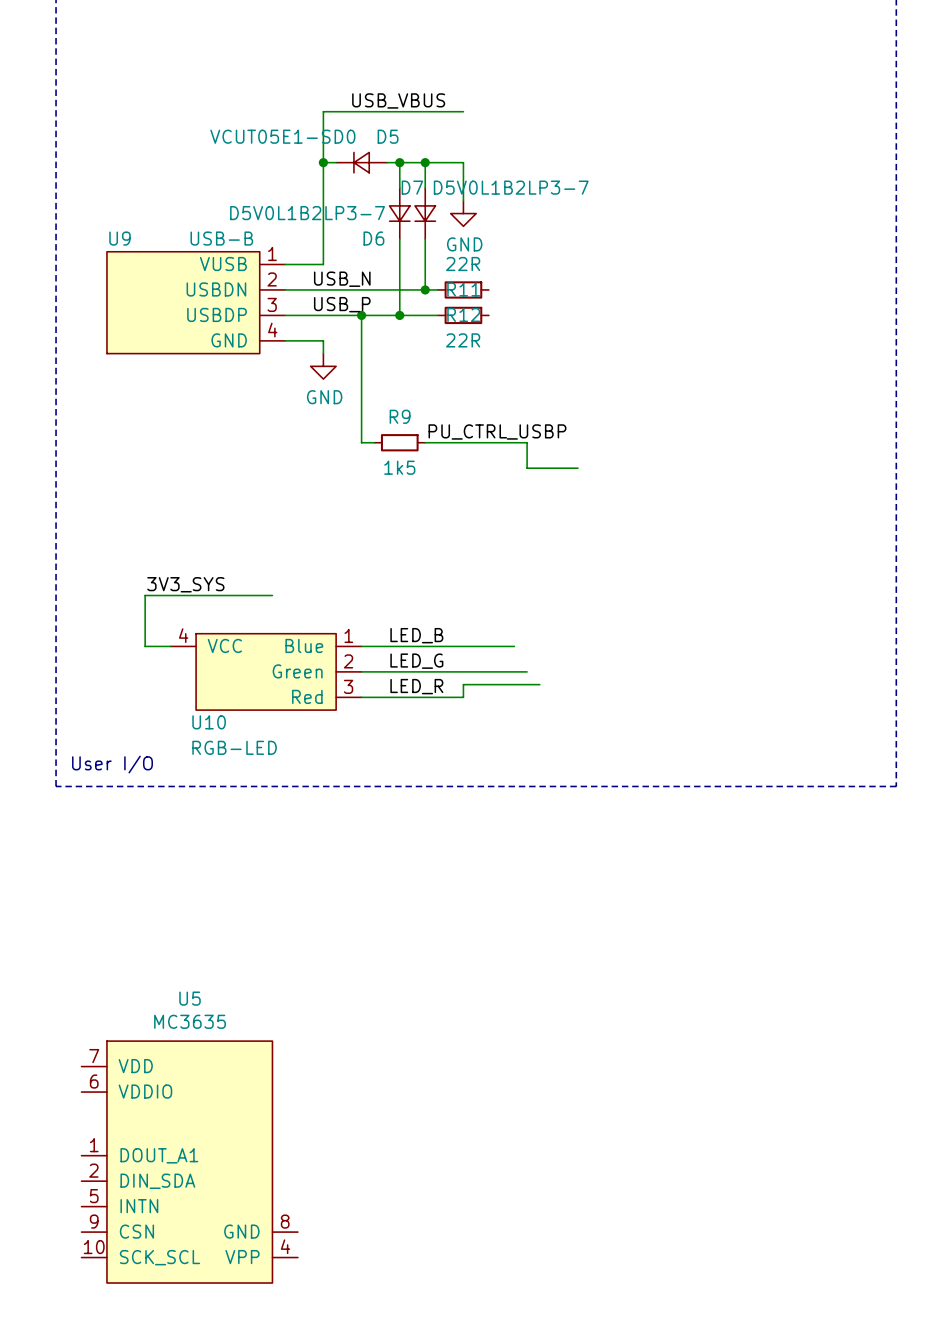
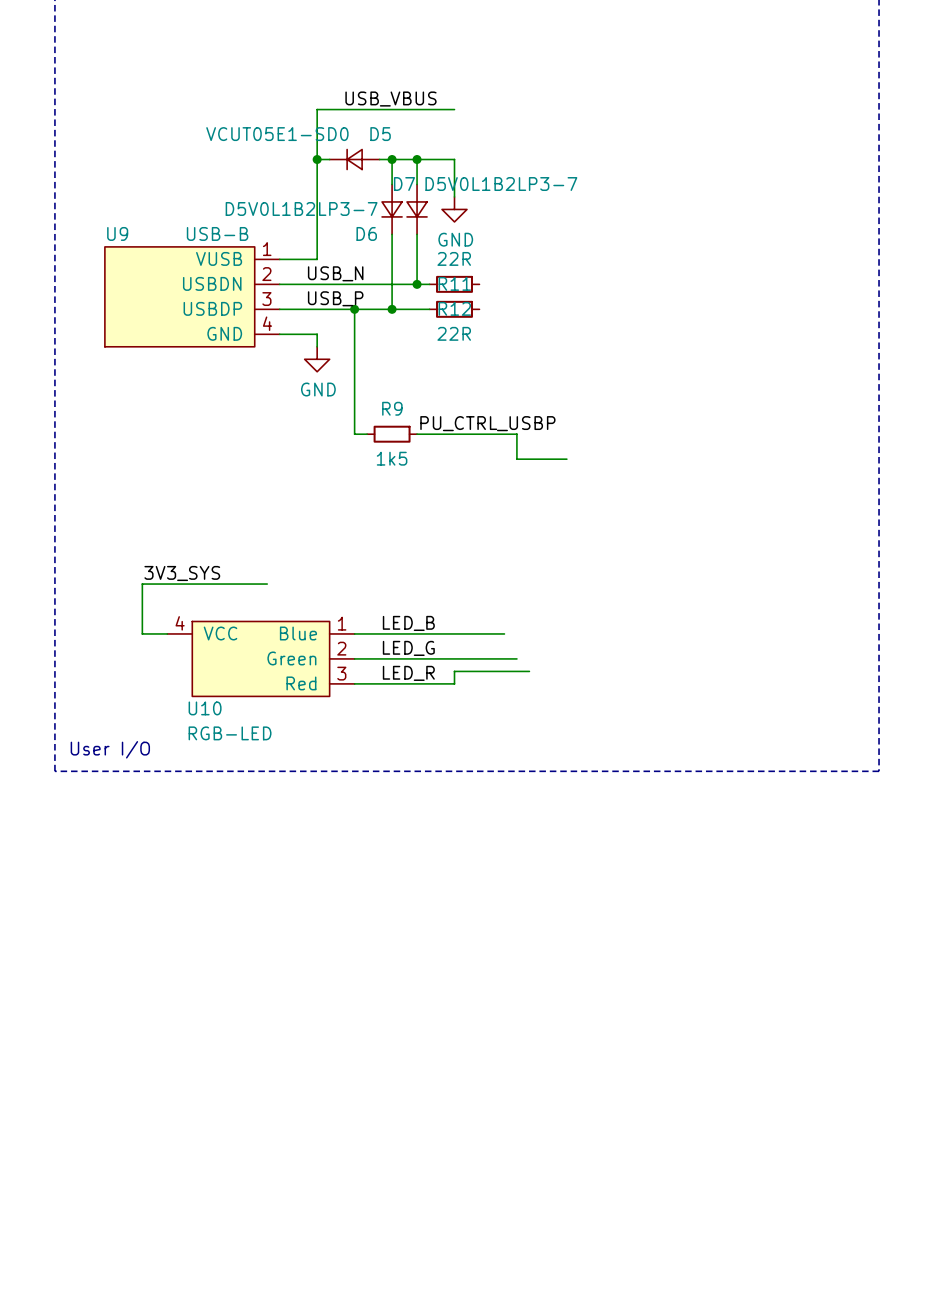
U5: MC3635 (189, 1162) -> none

